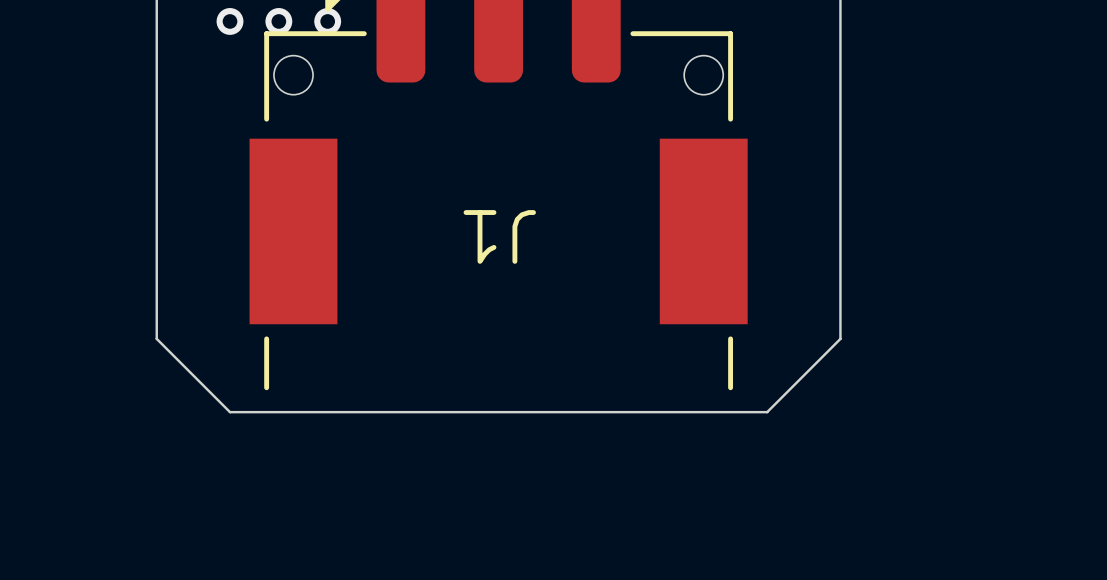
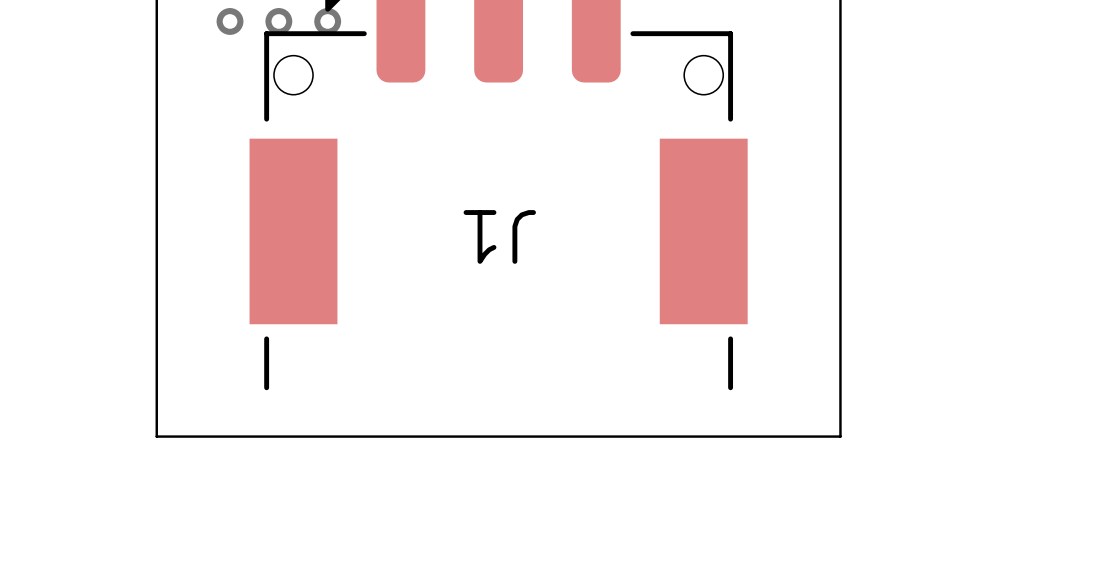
board edge: (156, 338) (230, 412) (767, 412) (840, 338) -> (156, 338) (156, 436) (840, 436) (840, 338)

